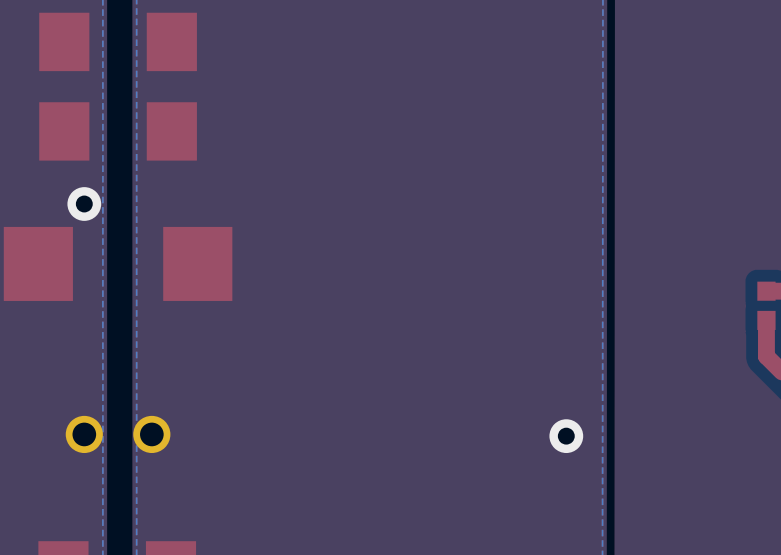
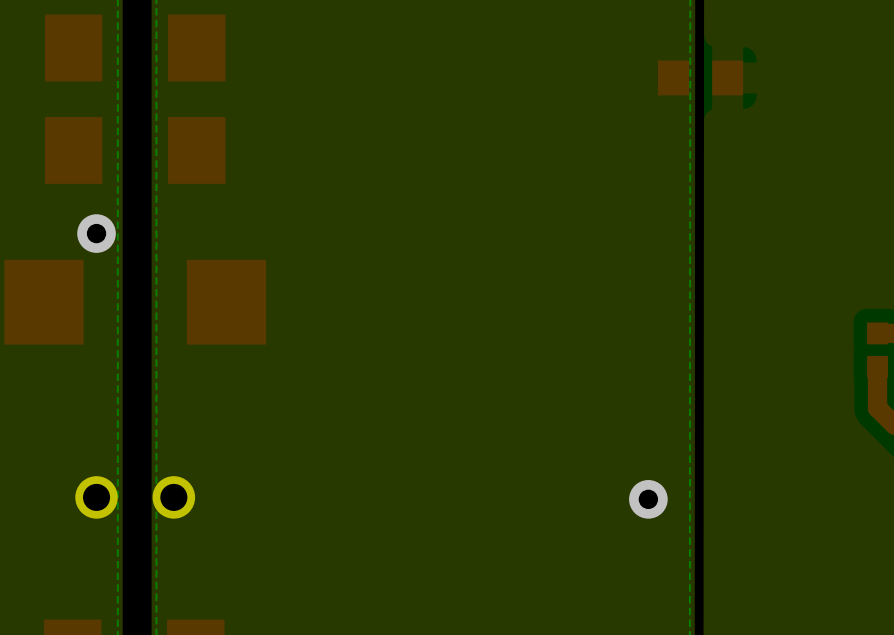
part: none -> (700, 77)

